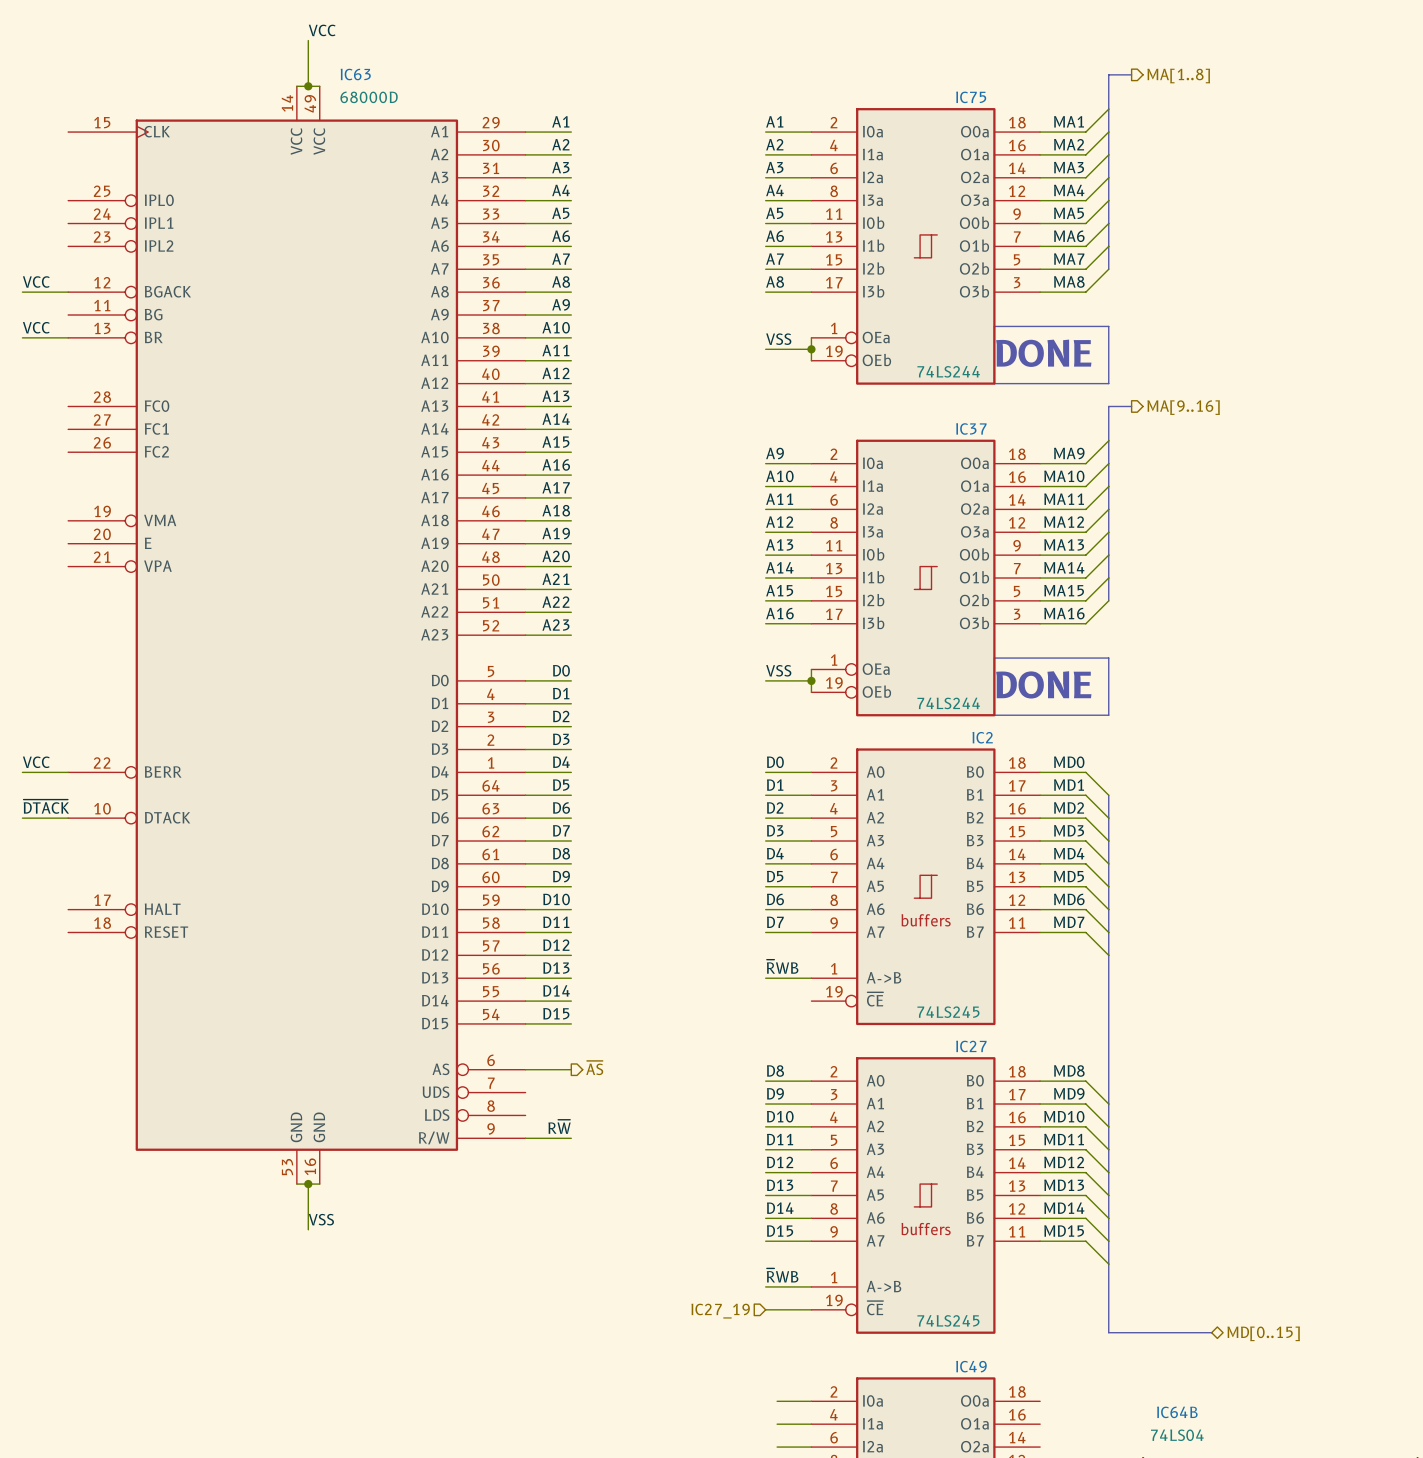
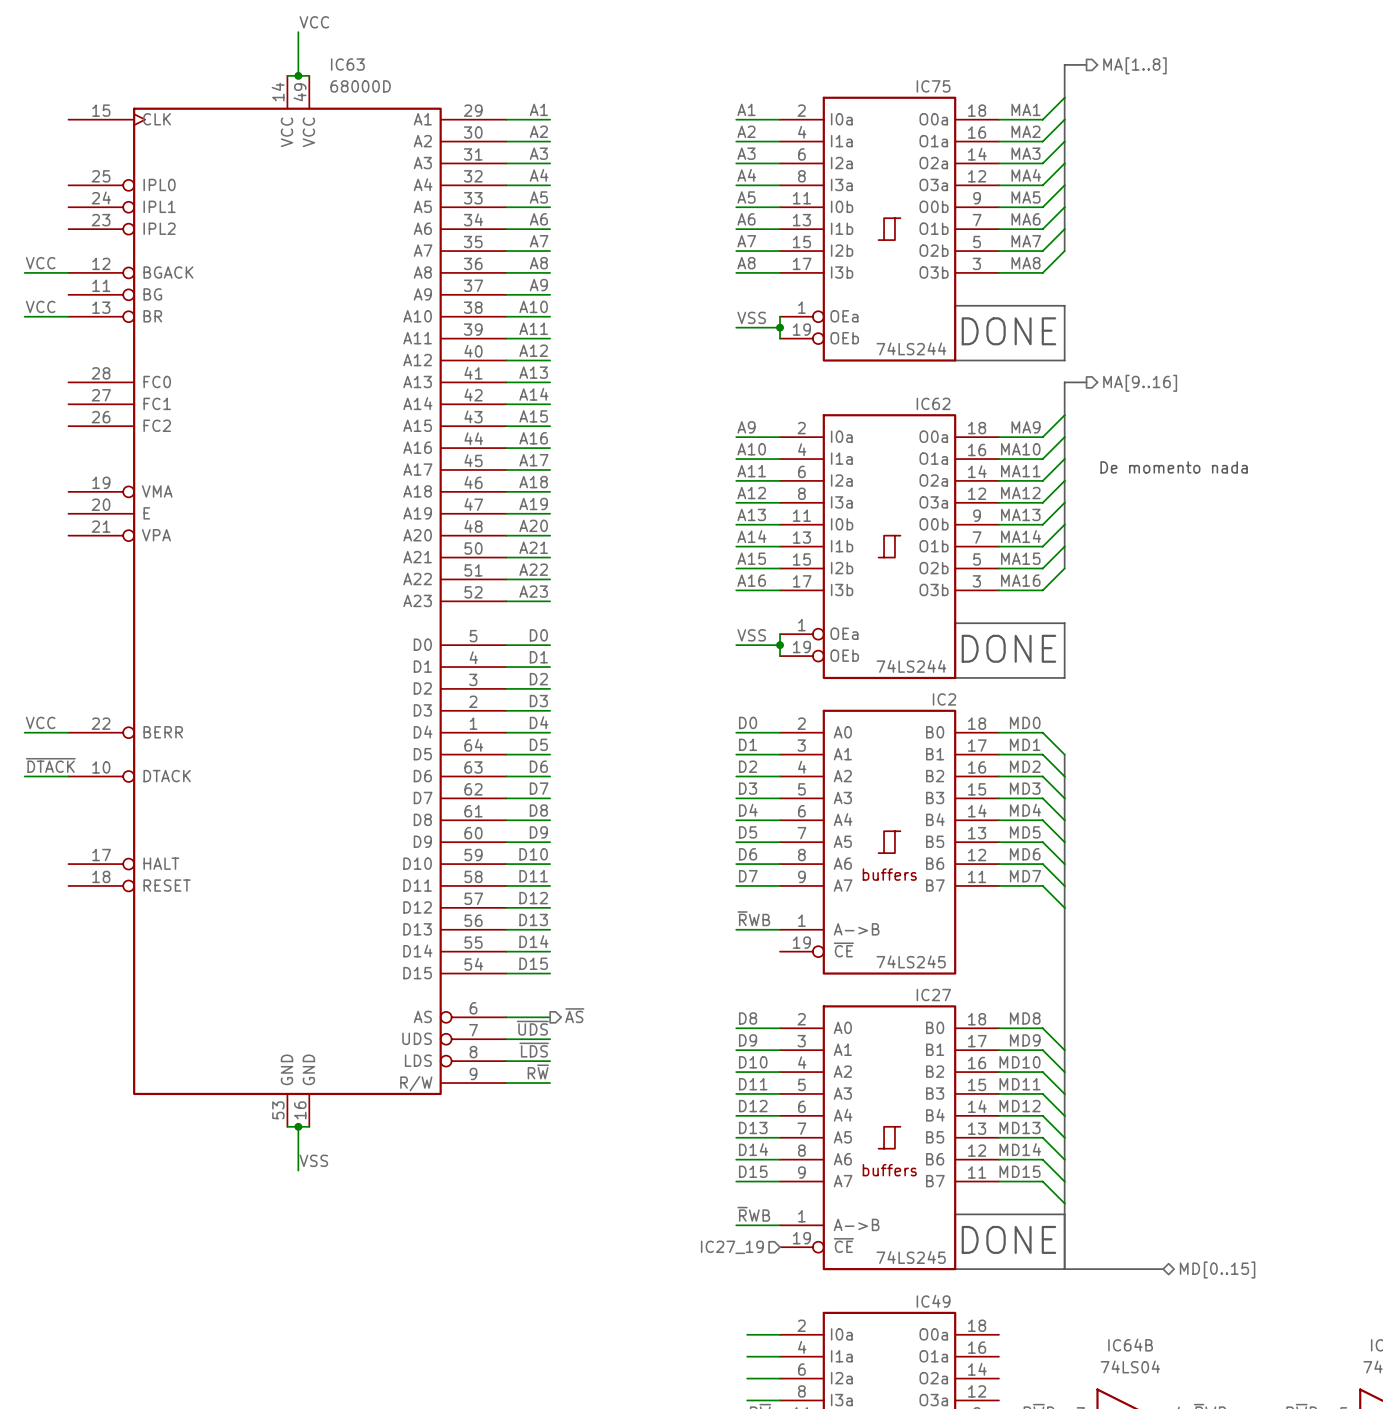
IC37 name: IC37 (971, 428) -> IC62 (933, 403)
text: none -> De momento nada (1174, 467)
label: none -> ~{UDS} (532, 1028)
wire: none -> (506, 1039) (550, 1039)
label: none -> ~{LDS} (534, 1050)
wire: none -> (506, 1061) (550, 1061)
line: none -> (955, 1214) (1064, 1214) (1064, 1269) (955, 1269) (955, 1214)
text: none -> DONE (1008, 1239)
wire: (765, 1309) (811, 1309) -> none
hierarchical label position: IC27_19 (720, 1311) -> IC27_19 (732, 1247)

